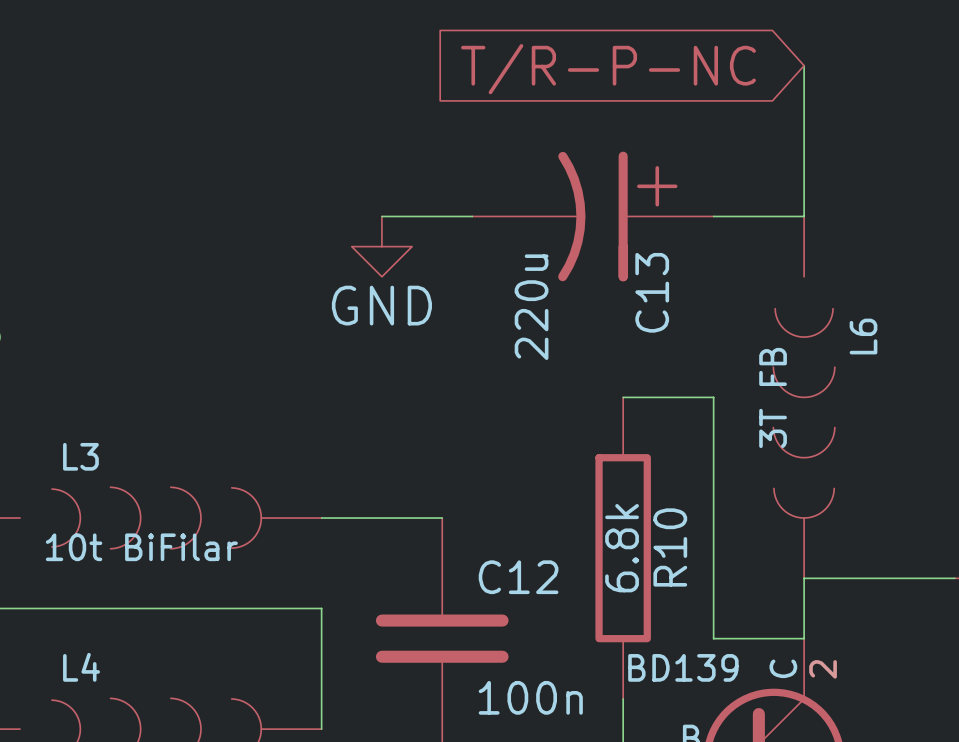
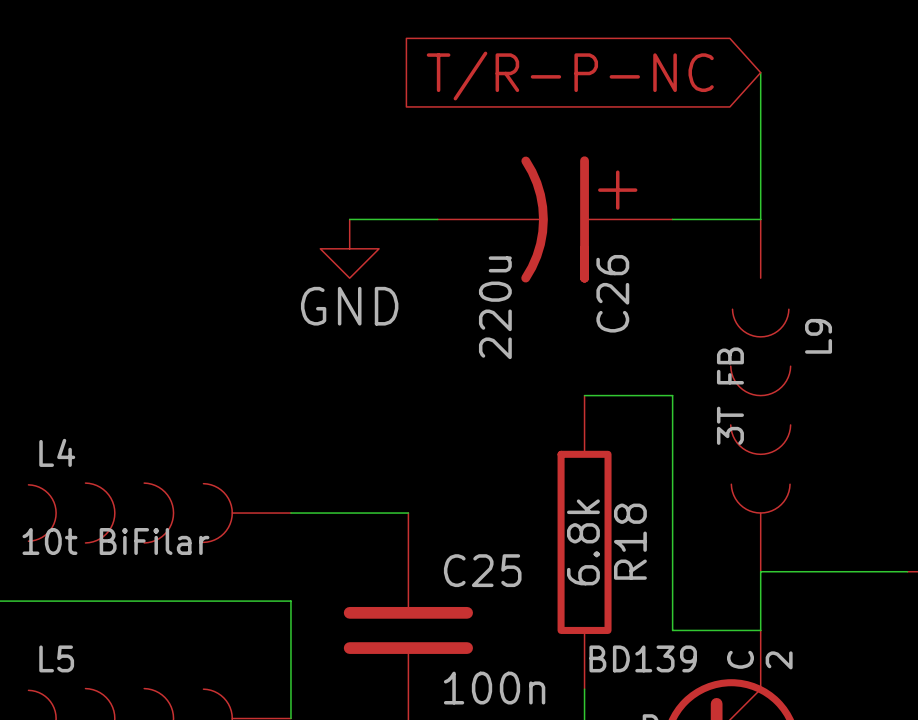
C13 name: C13 (652, 292) -> C26 (612, 293)
L6 name: L6 (863, 336) -> L9 (818, 336)
L3 name: L3 (80, 456) -> L4 (57, 452)
R10 name: R10 (670, 547) -> R18 (630, 541)
C12 name: C12 (518, 577) -> C25 (482, 570)
L4 name: L4 (81, 667) -> L5 (56, 658)

